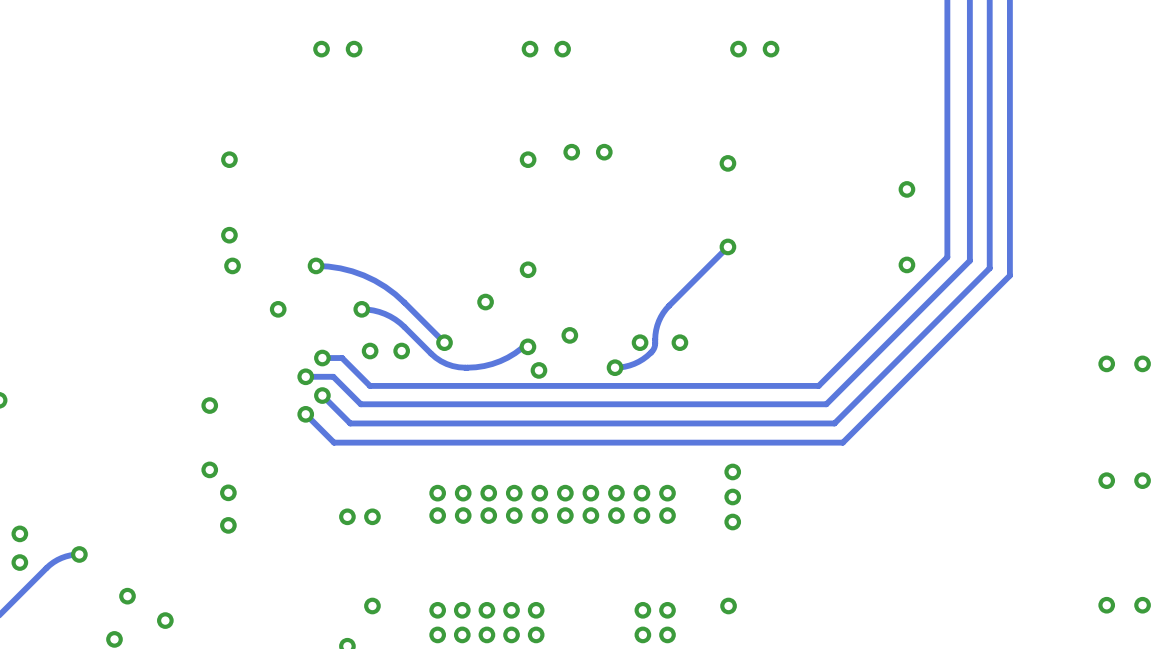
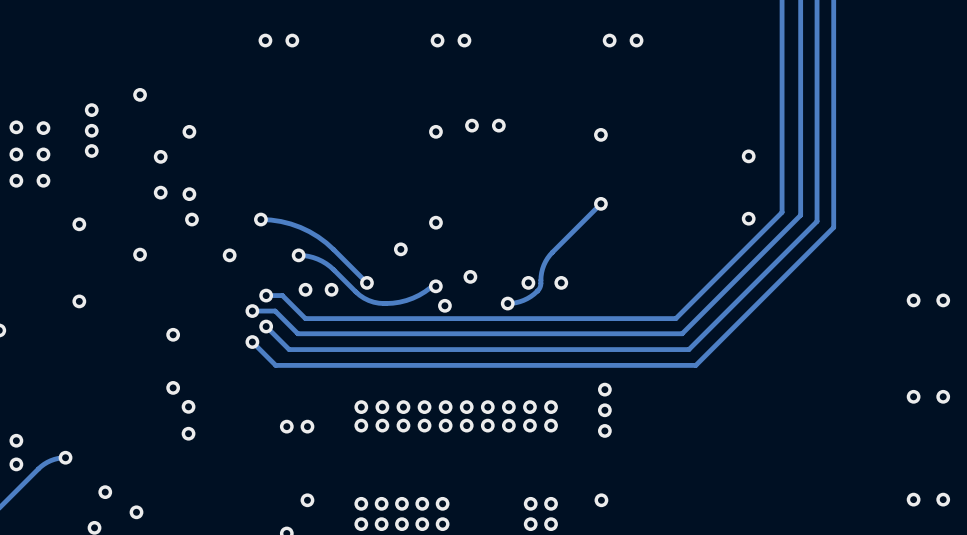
via: none -> (140, 94)
via: none -> (91, 110)
via: none -> (16, 127)
via: none -> (43, 128)
via: none -> (91, 130)
via: none -> (91, 150)
via: none -> (16, 154)
via: none -> (43, 154)
via: none -> (160, 156)
via: none -> (16, 180)
via: none -> (43, 180)
via: none -> (160, 192)
via: none -> (79, 224)
via: none -> (140, 254)
via: none -> (79, 301)

